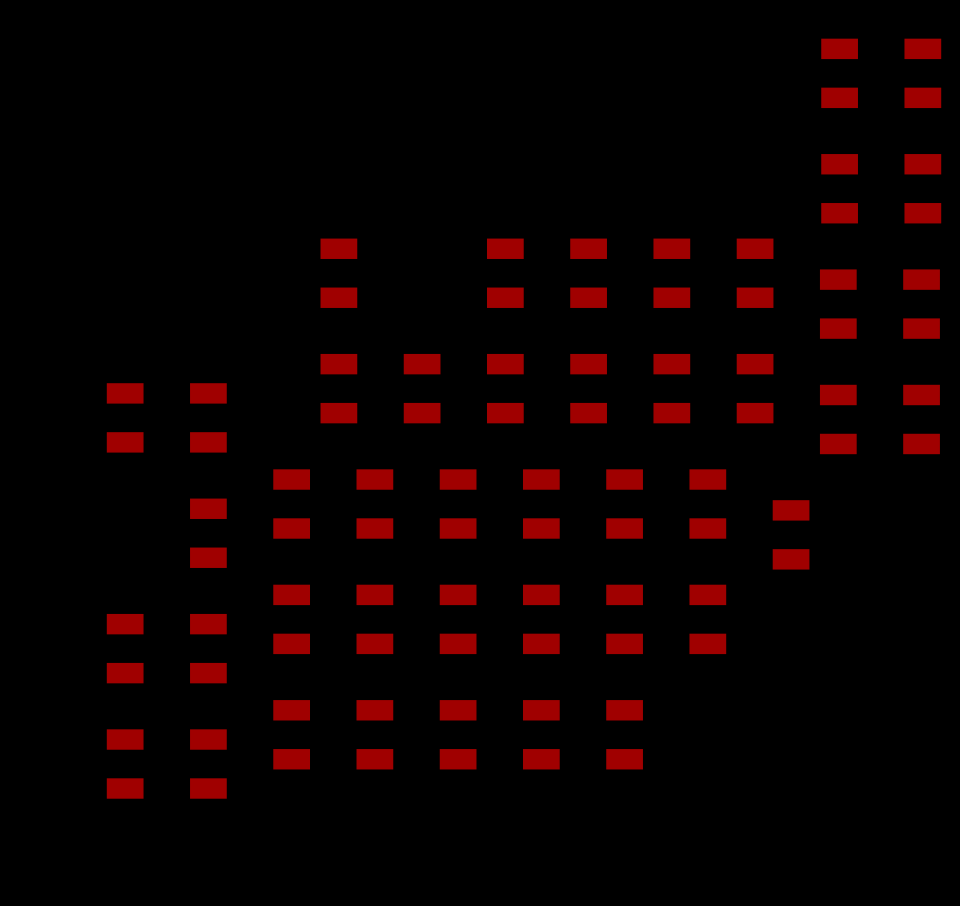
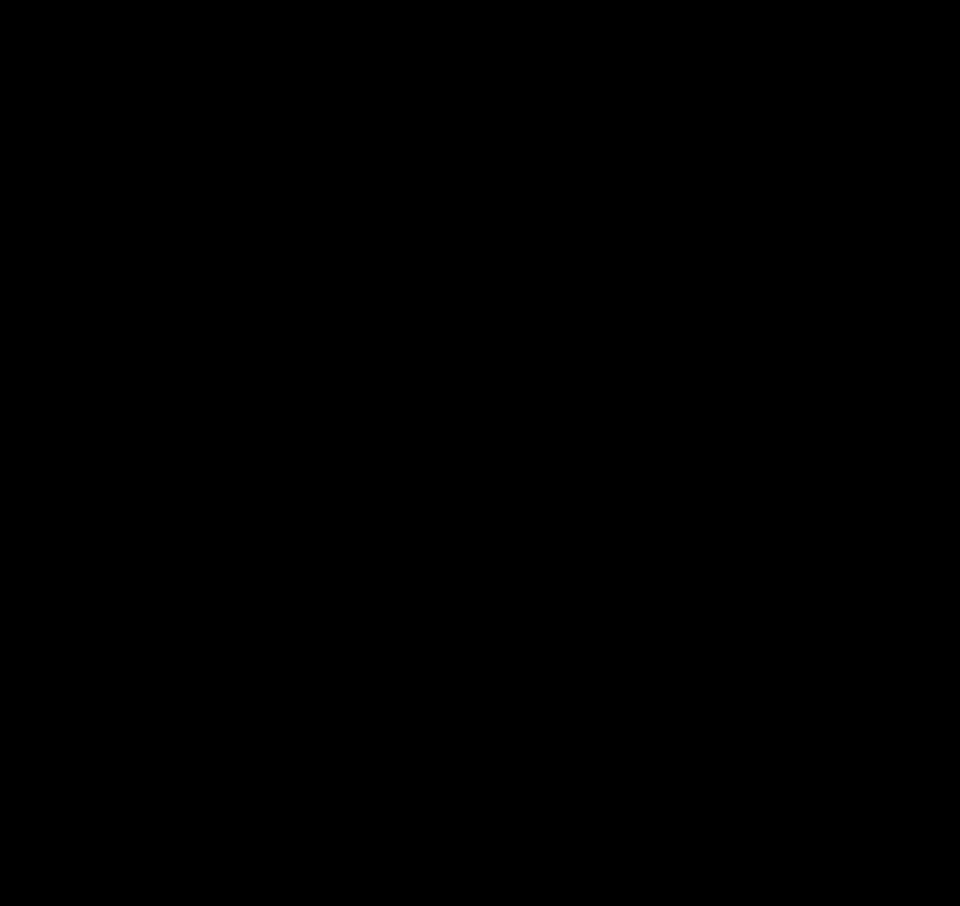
part: (839, 73) -> none
part: (922, 73) -> none
part: (839, 188) -> none
part: (922, 188) -> none
part: (338, 273) -> none
part: (505, 273) -> none
part: (588, 273) -> none
part: (671, 273) -> none
part: (755, 273) -> none
part: (838, 304) -> none
part: (921, 304) -> none
part: (338, 388) -> none
part: (422, 388) -> none
part: (505, 388) -> none
part: (588, 388) -> none
part: (671, 388) -> none
part: (755, 388) -> none
part: (125, 417) -> none
part: (208, 417) -> none
part: (838, 419) -> none
part: (921, 419) -> none
part: (291, 504) -> none
part: (374, 504) -> none
part: (458, 504) -> none
part: (541, 504) -> none
part: (624, 504) -> none
part: (707, 504) -> none
part: (208, 533) -> none
part: (791, 534) -> none
part: (291, 619) -> none
part: (374, 619) -> none
part: (458, 619) -> none
part: (541, 619) -> none
part: (624, 619) -> none
part: (707, 619) -> none
part: (125, 648) -> none
part: (208, 648) -> none
part: (291, 734) -> none
part: (374, 734) -> none
part: (458, 734) -> none
part: (541, 734) -> none
part: (624, 734) -> none
part: (125, 764) -> none
part: (208, 764) -> none

